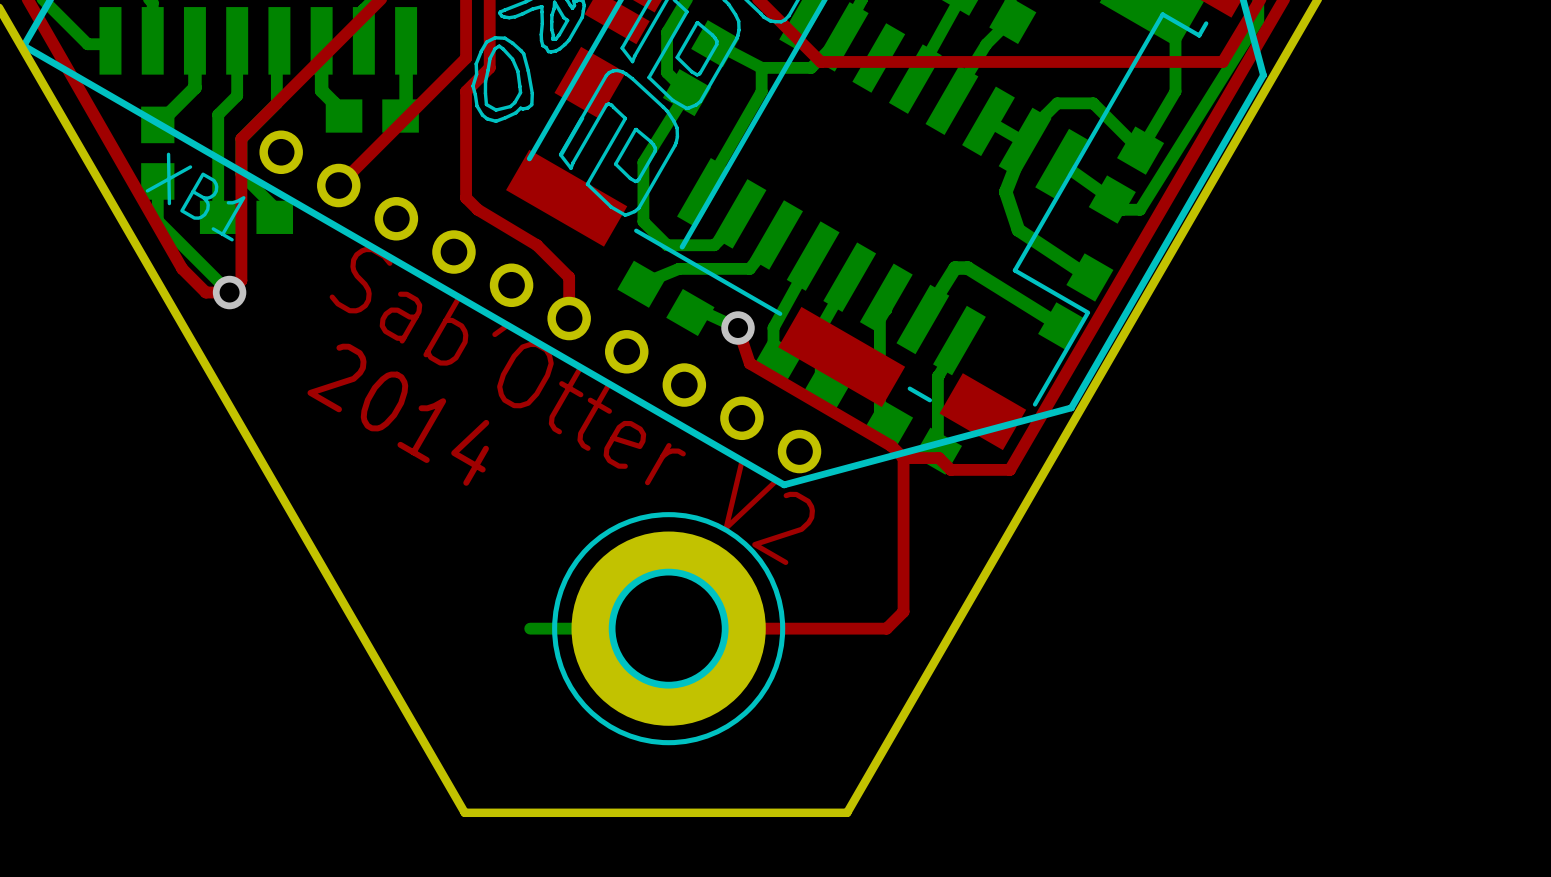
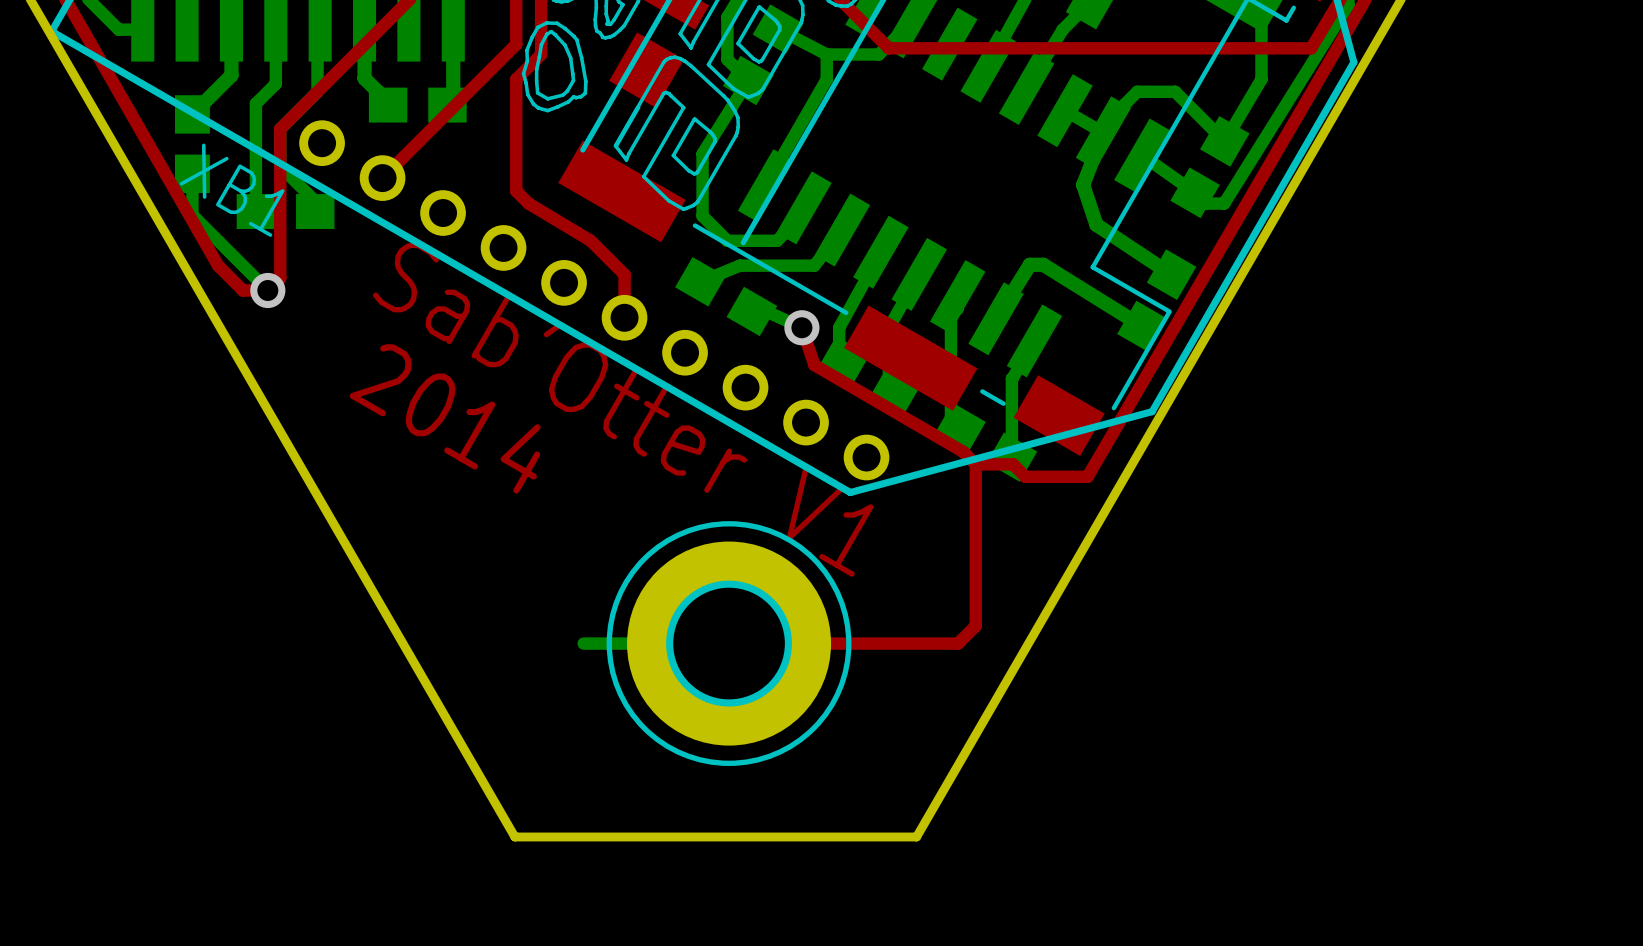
text: Sab'Otter V2 (572, 405) -> Sab'Otter V1 (623, 409)

